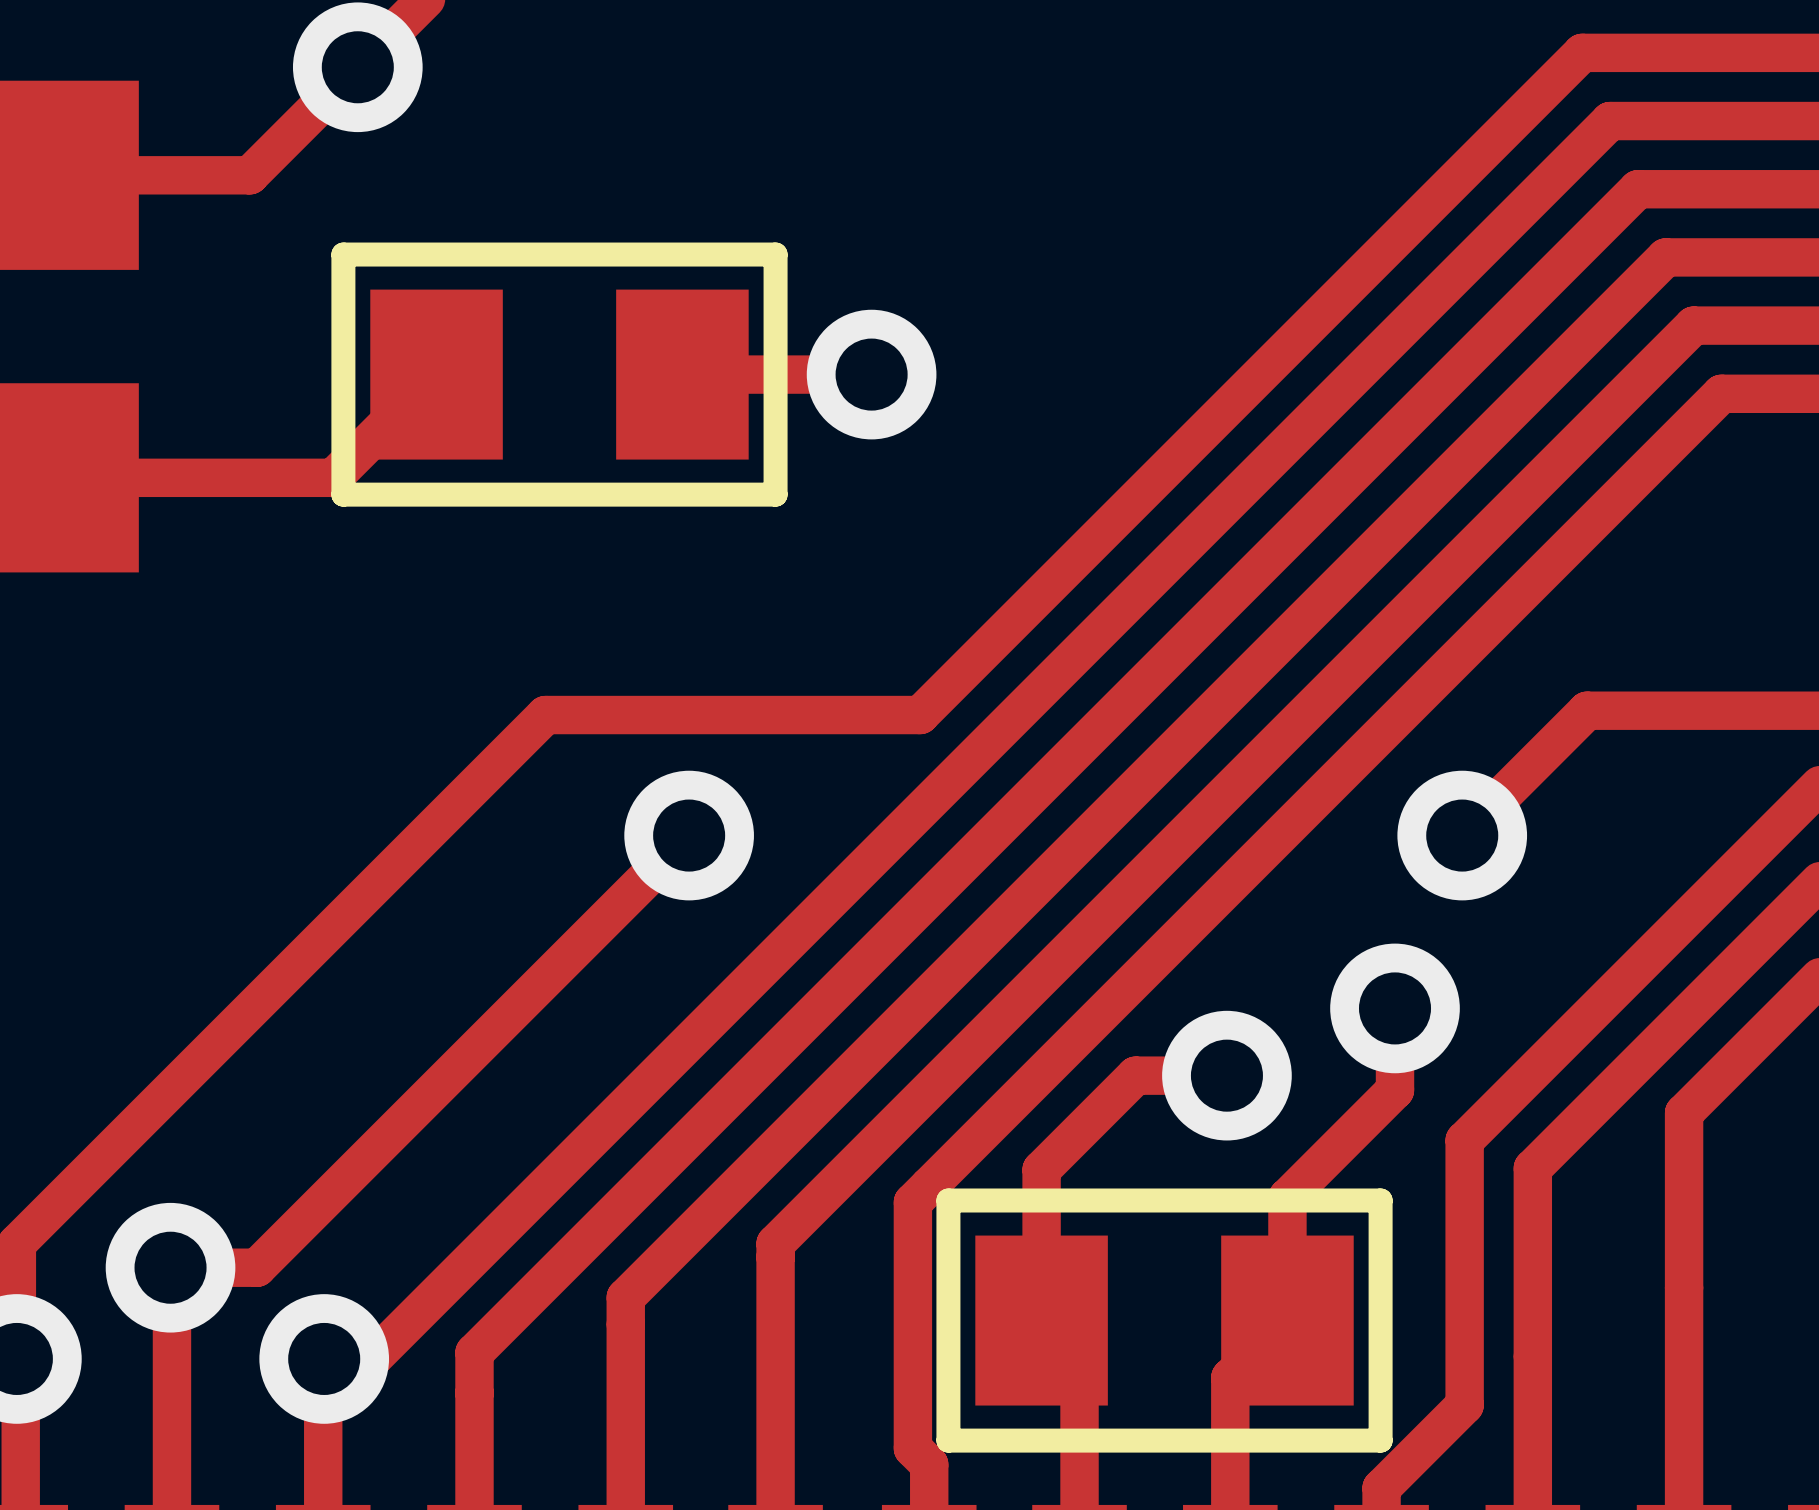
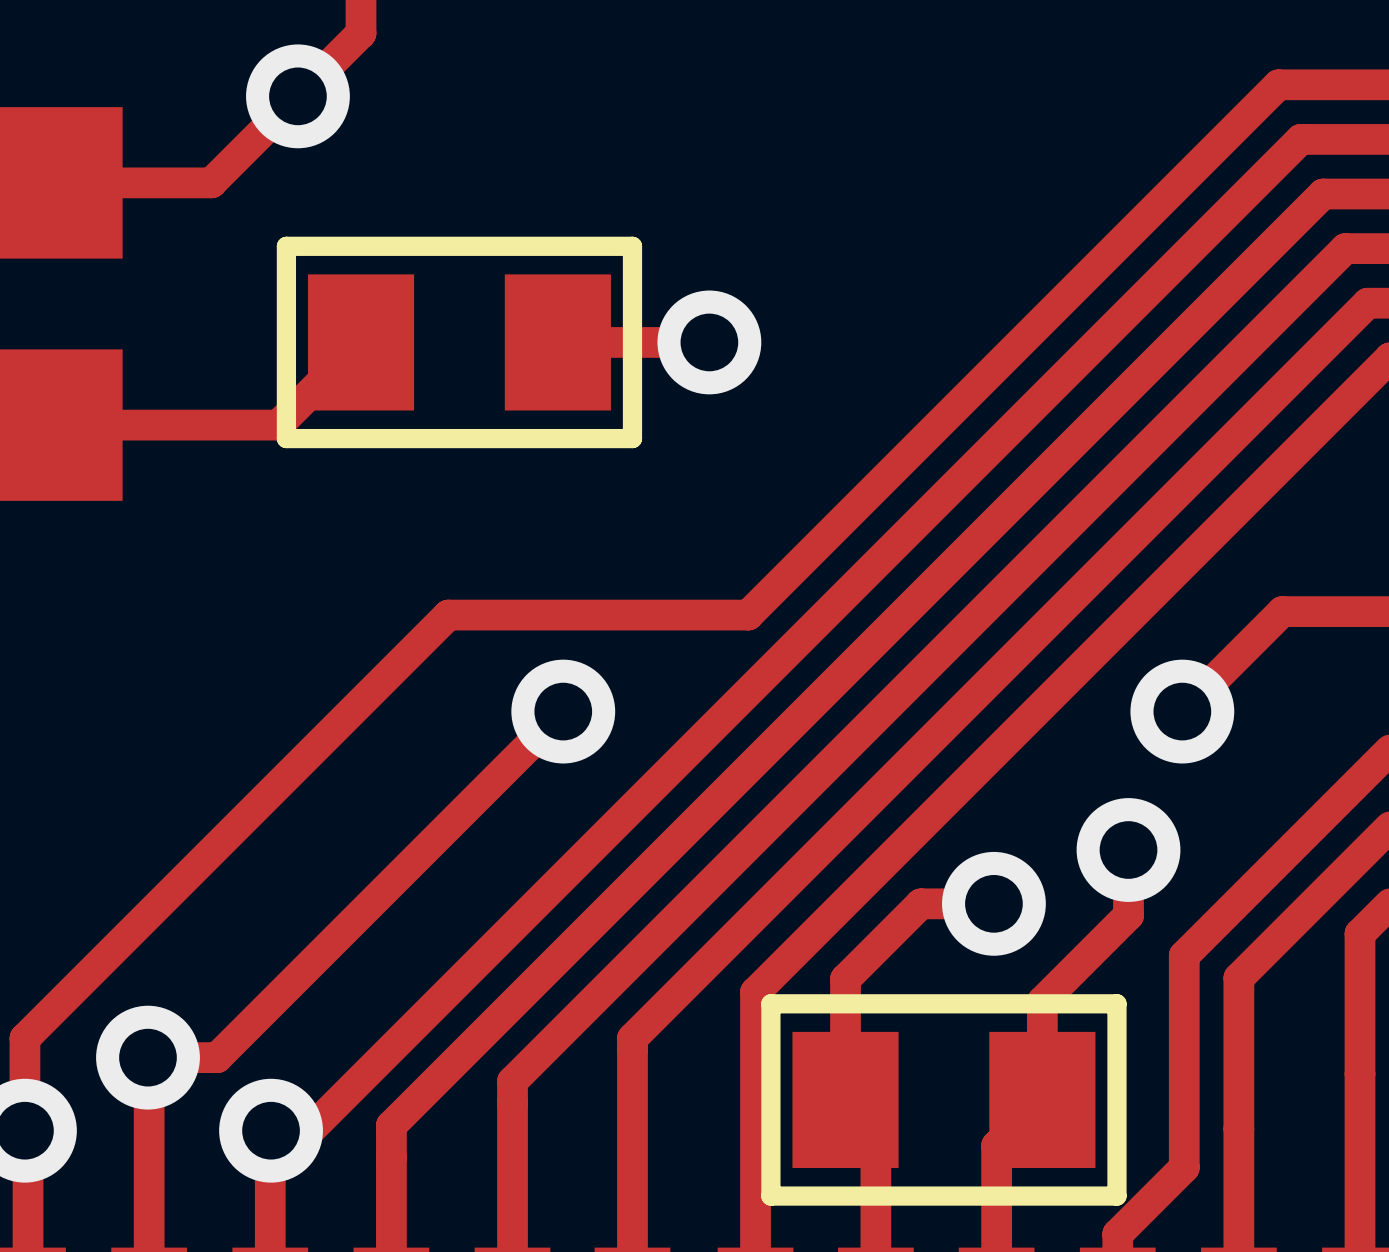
track: (929, 1186) (912, 1202) (912, 1448) (929, 1464) -> (755, 992) (755, 1215)

